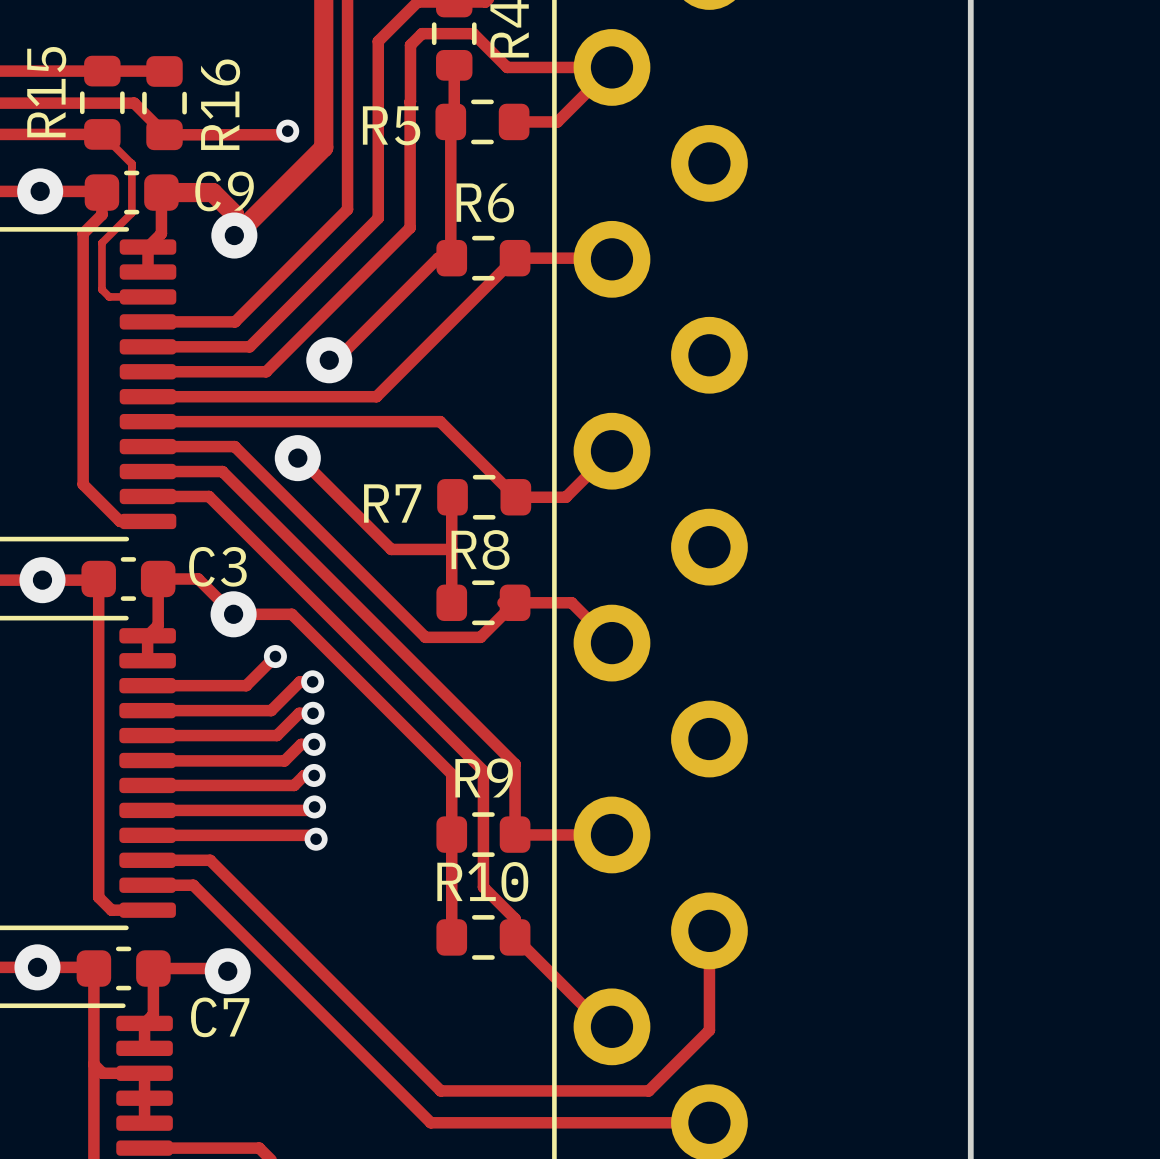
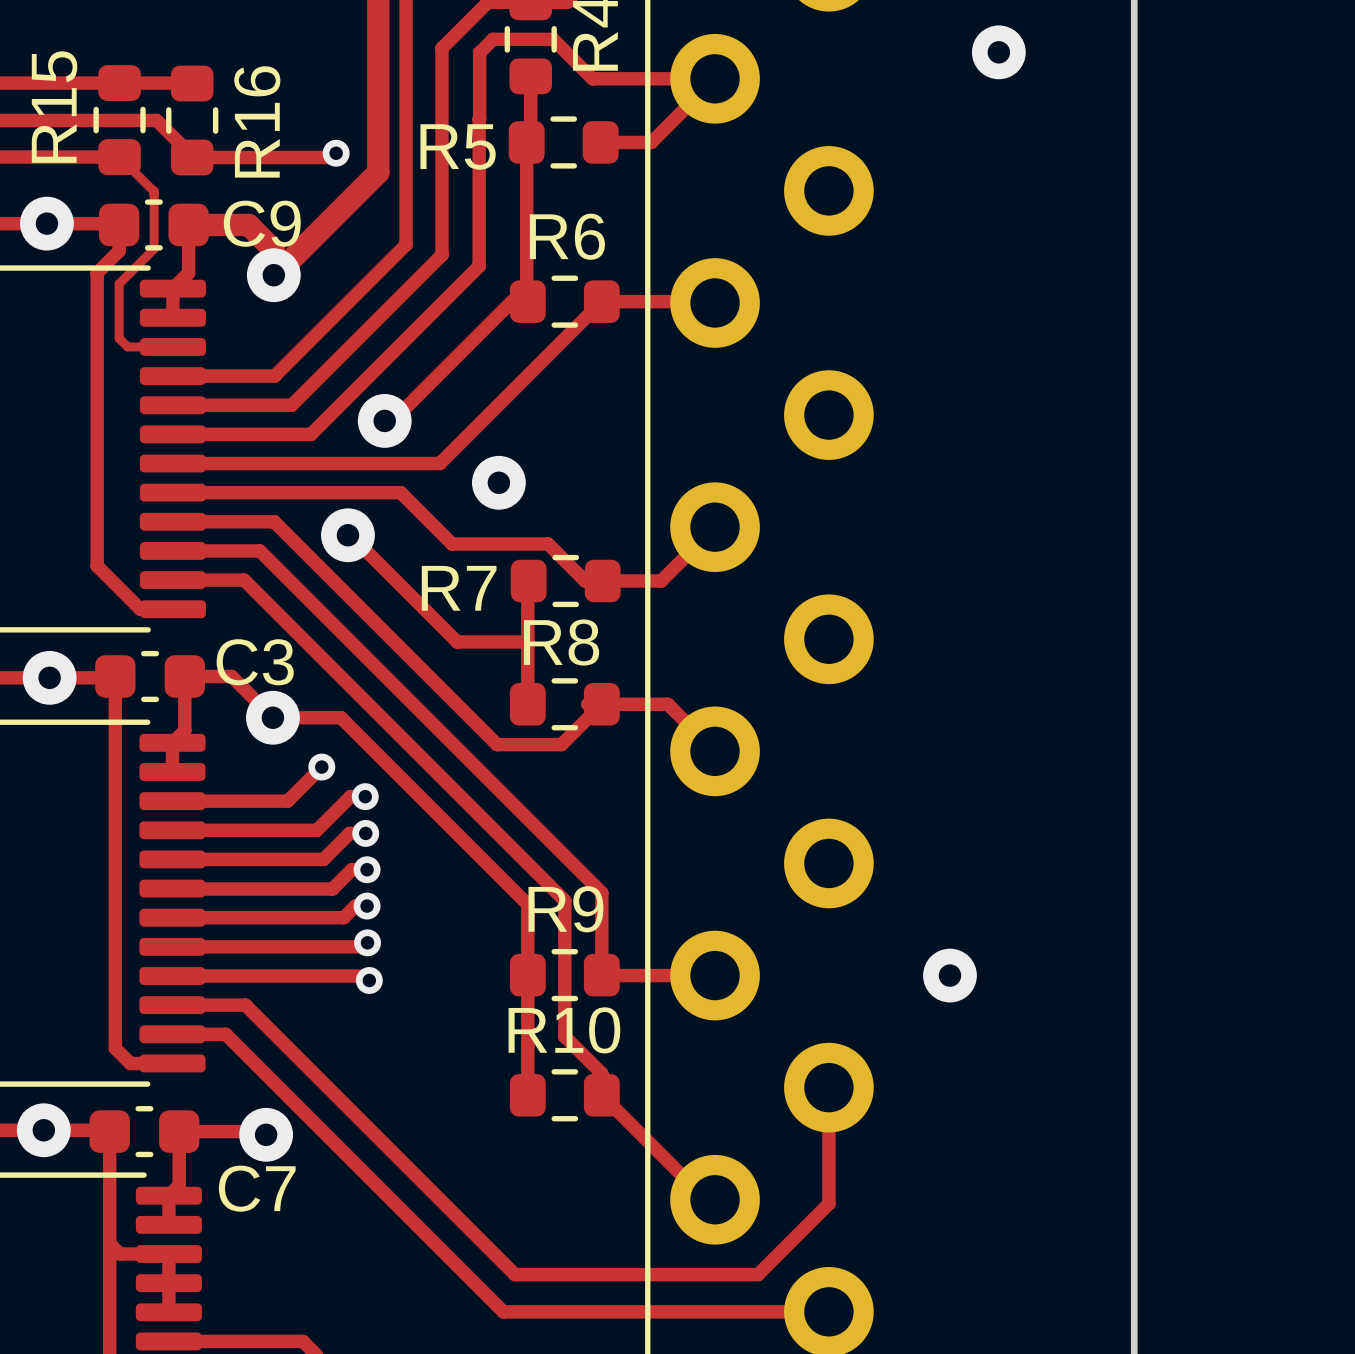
via: none -> (998, 52)
via: none -> (498, 482)
track: (342, 421) (440, 421) (515, 497) -> (400, 492) (452, 544) (548, 544) (585, 580) (602, 580)
via: none -> (949, 975)

